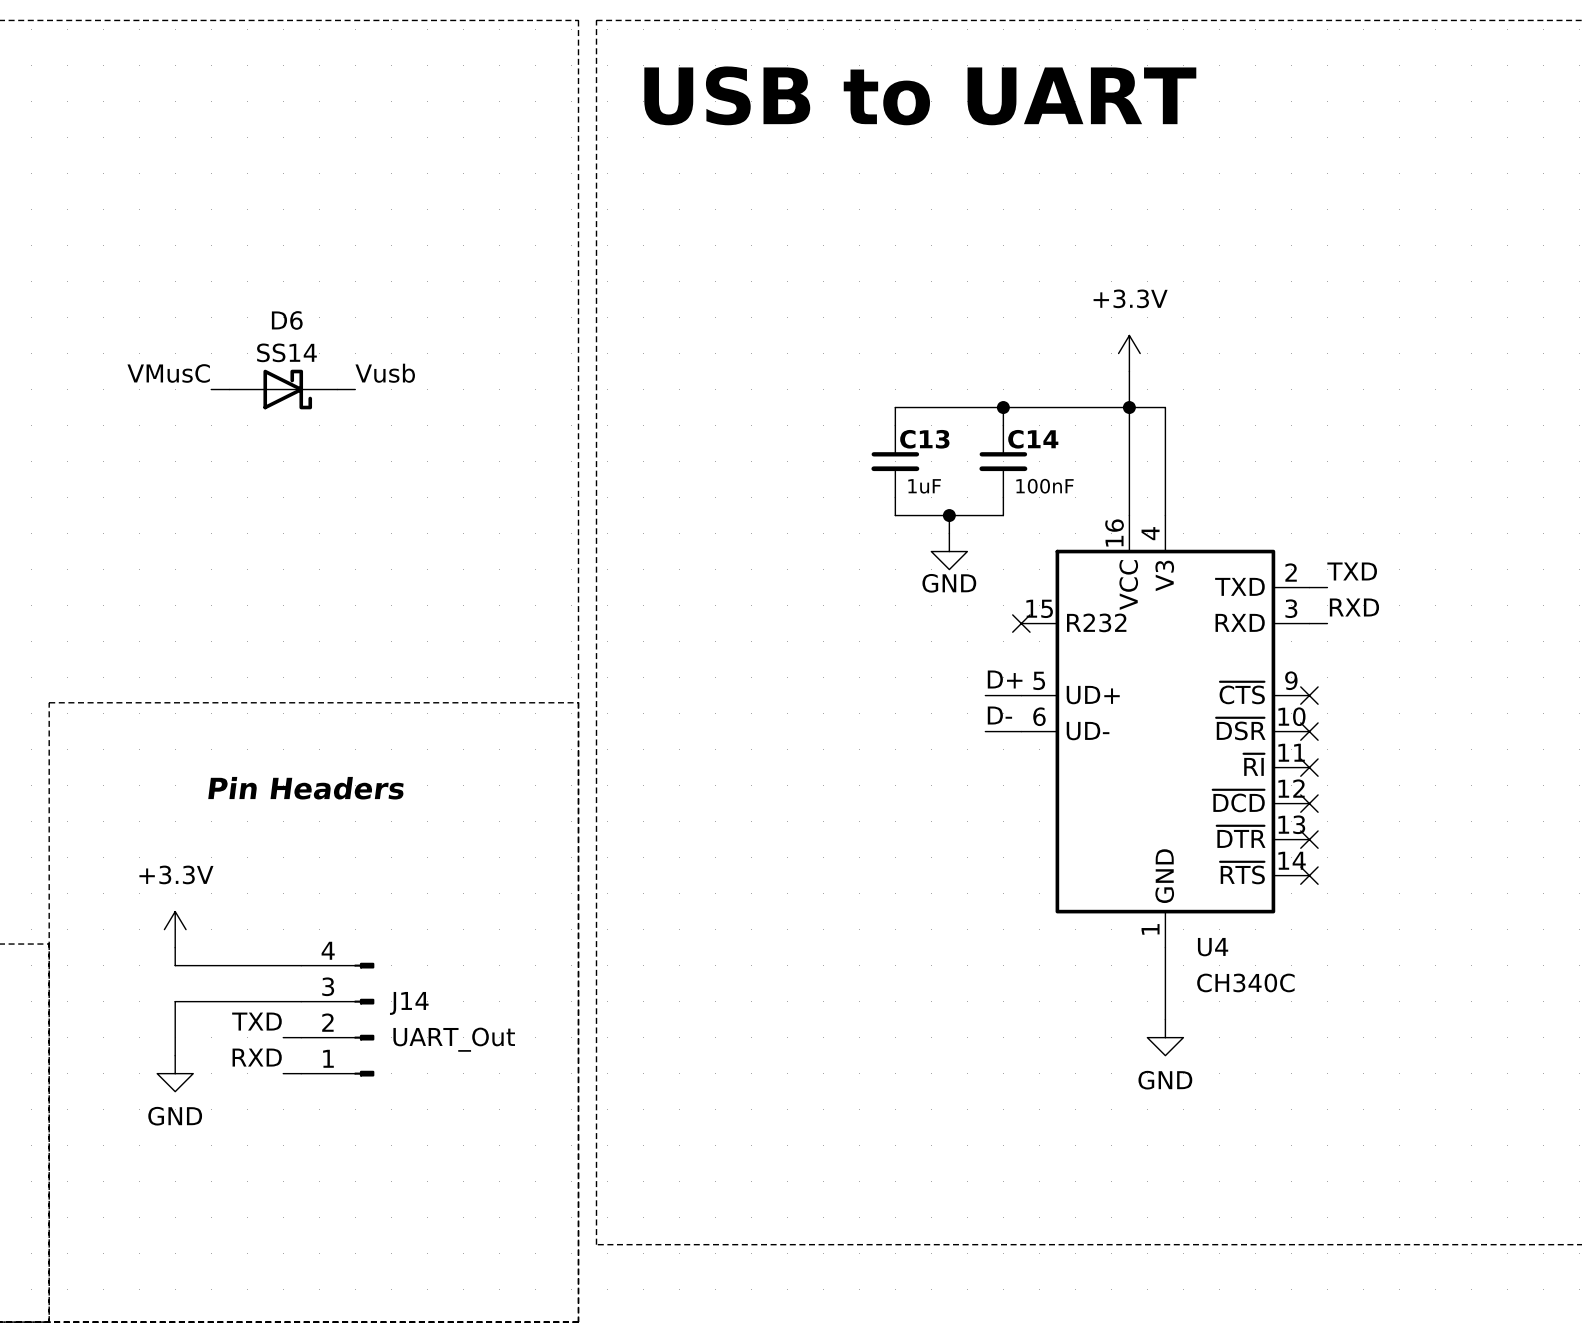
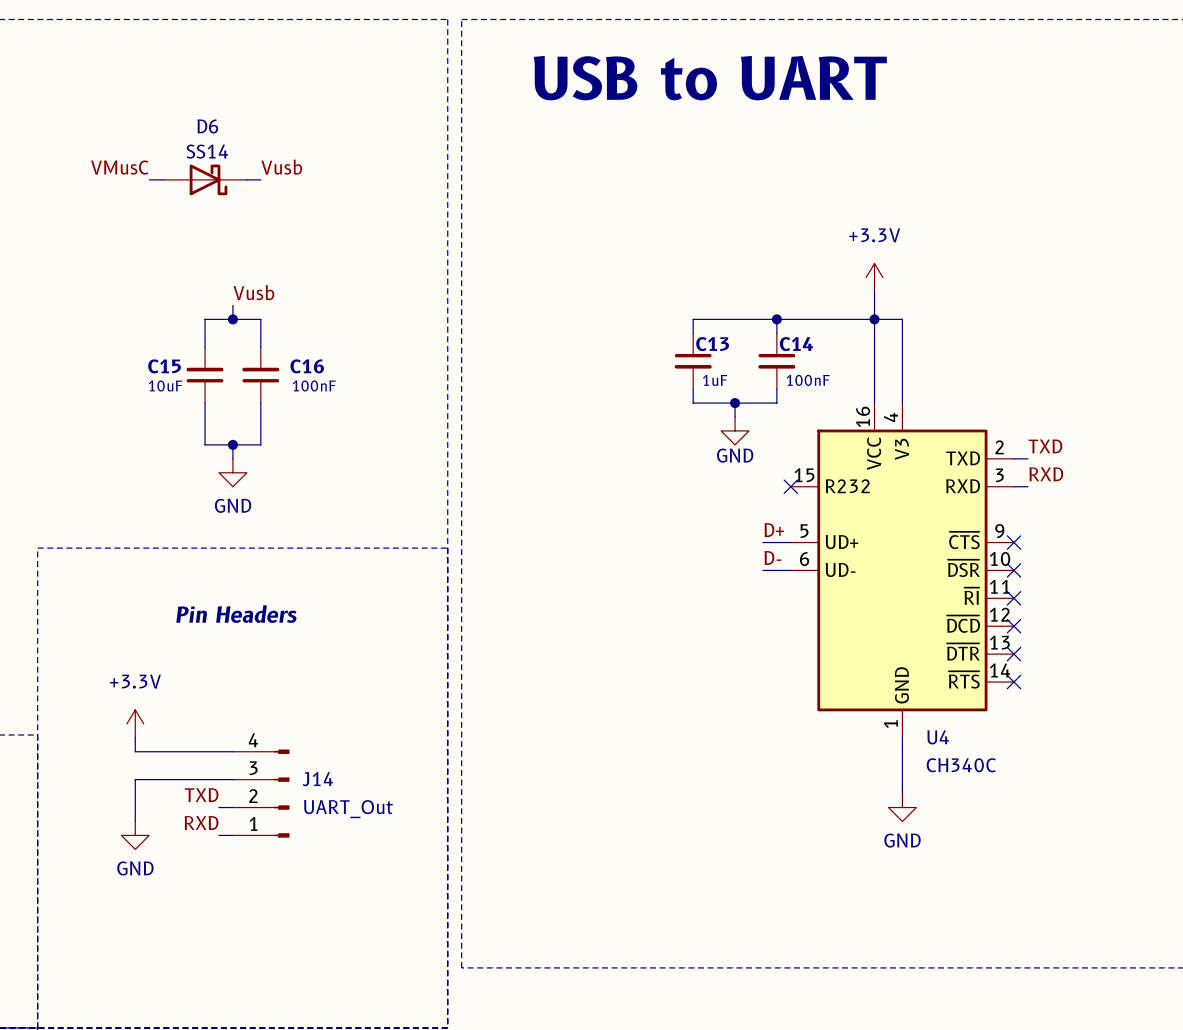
label: none -> Vusb (281, 167)
label position: VMusC (168, 373) -> VMusC (119, 167)
label position: Vusb (385, 373) -> Vusb (253, 292)
wire: (211, 389) (229, 389) -> (149, 179) (163, 179)
D6 position: (283, 389) -> (205, 179)
wire: (337, 389) (355, 389) -> (246, 179) (260, 179)
junction: none -> (232, 319)
wire: none -> (205, 347) (205, 319) (260, 319) (260, 347)
C15: none -> 10uF (205, 375)
C16: none -> 100nF (260, 375)
wire: none -> (205, 403) (205, 444) (260, 444) (260, 403)
wire: none -> (232, 444) (232, 458)
junction: none -> (232, 444)
power symbol: none -> GND (232, 472)

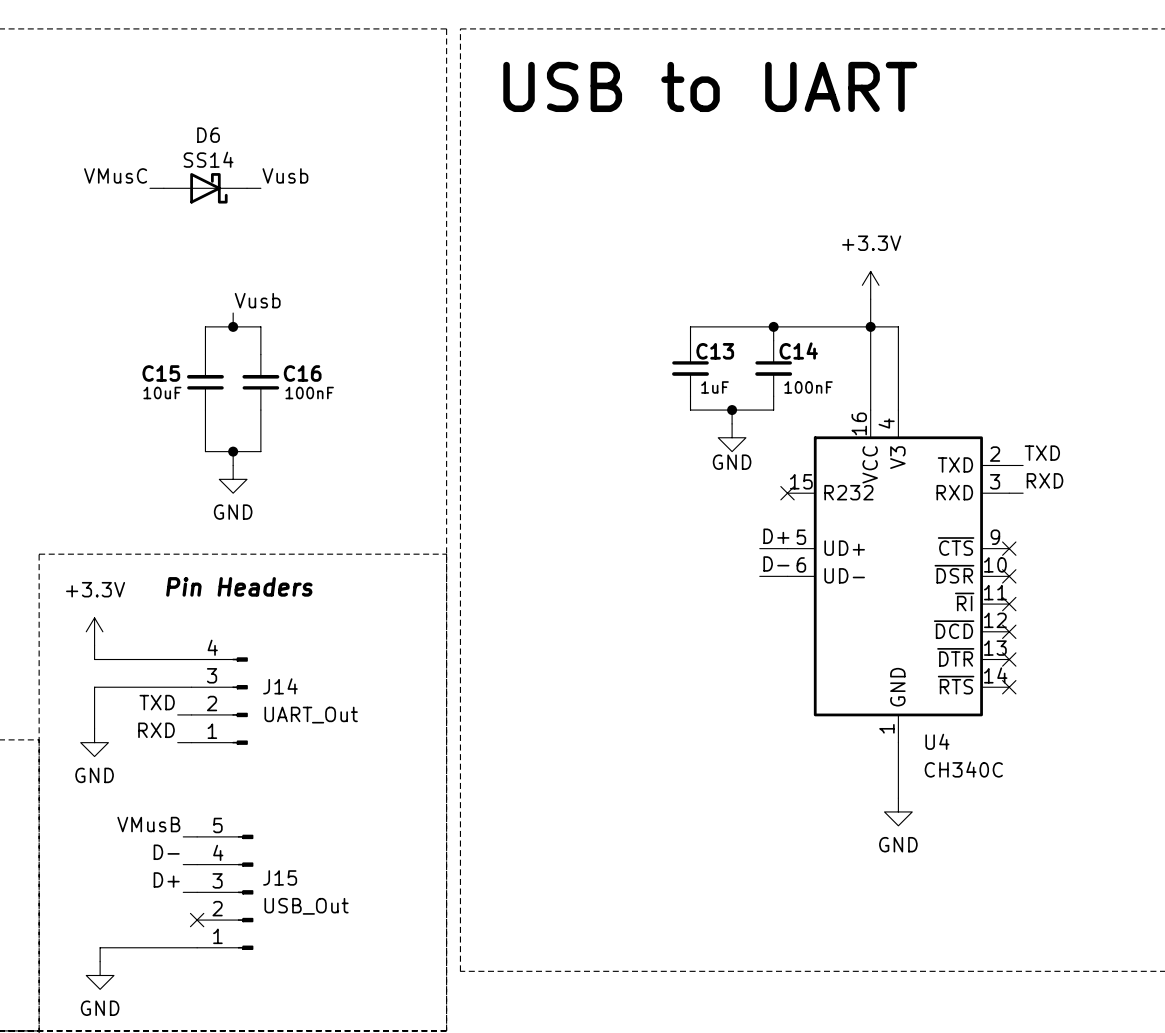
text position: Pin Headers (236, 614) -> Pin Headers (239, 586)
power symbol position: +3.3V (135, 723) -> +3.3V (94, 631)
power symbol: none -> GND (94, 742)
wire: (135, 737) (135, 751) (232, 751) -> (94, 645) (94, 659) (191, 659)
wire: (232, 779) (135, 779) (135, 821) -> (191, 687) (94, 687) (94, 728)
J14 position: (261, 793) -> (219, 701)
label position: TXD (201, 795) -> TXD (157, 702)
wire: (218, 807) (232, 807) -> (177, 714) (191, 714)
label: none -> VMusB (148, 824)
label position: RXD (201, 822) -> RXD (156, 730)
wire: none -> (183, 836) (197, 836)
power symbol: GND (135, 835) -> none
wire: (218, 835) (232, 835) -> (177, 742) (191, 742)
label: none -> D- (166, 852)
wire: none -> (183, 864) (197, 864)
label: none -> D+ (166, 879)
wire: none -> (183, 892) (197, 892)
J15: none -> USB_Out (225, 892)
no-connect mark: none -> (197, 920)
wire: none -> (197, 947) (100, 947) (100, 961)
power symbol: none -> GND (100, 975)

